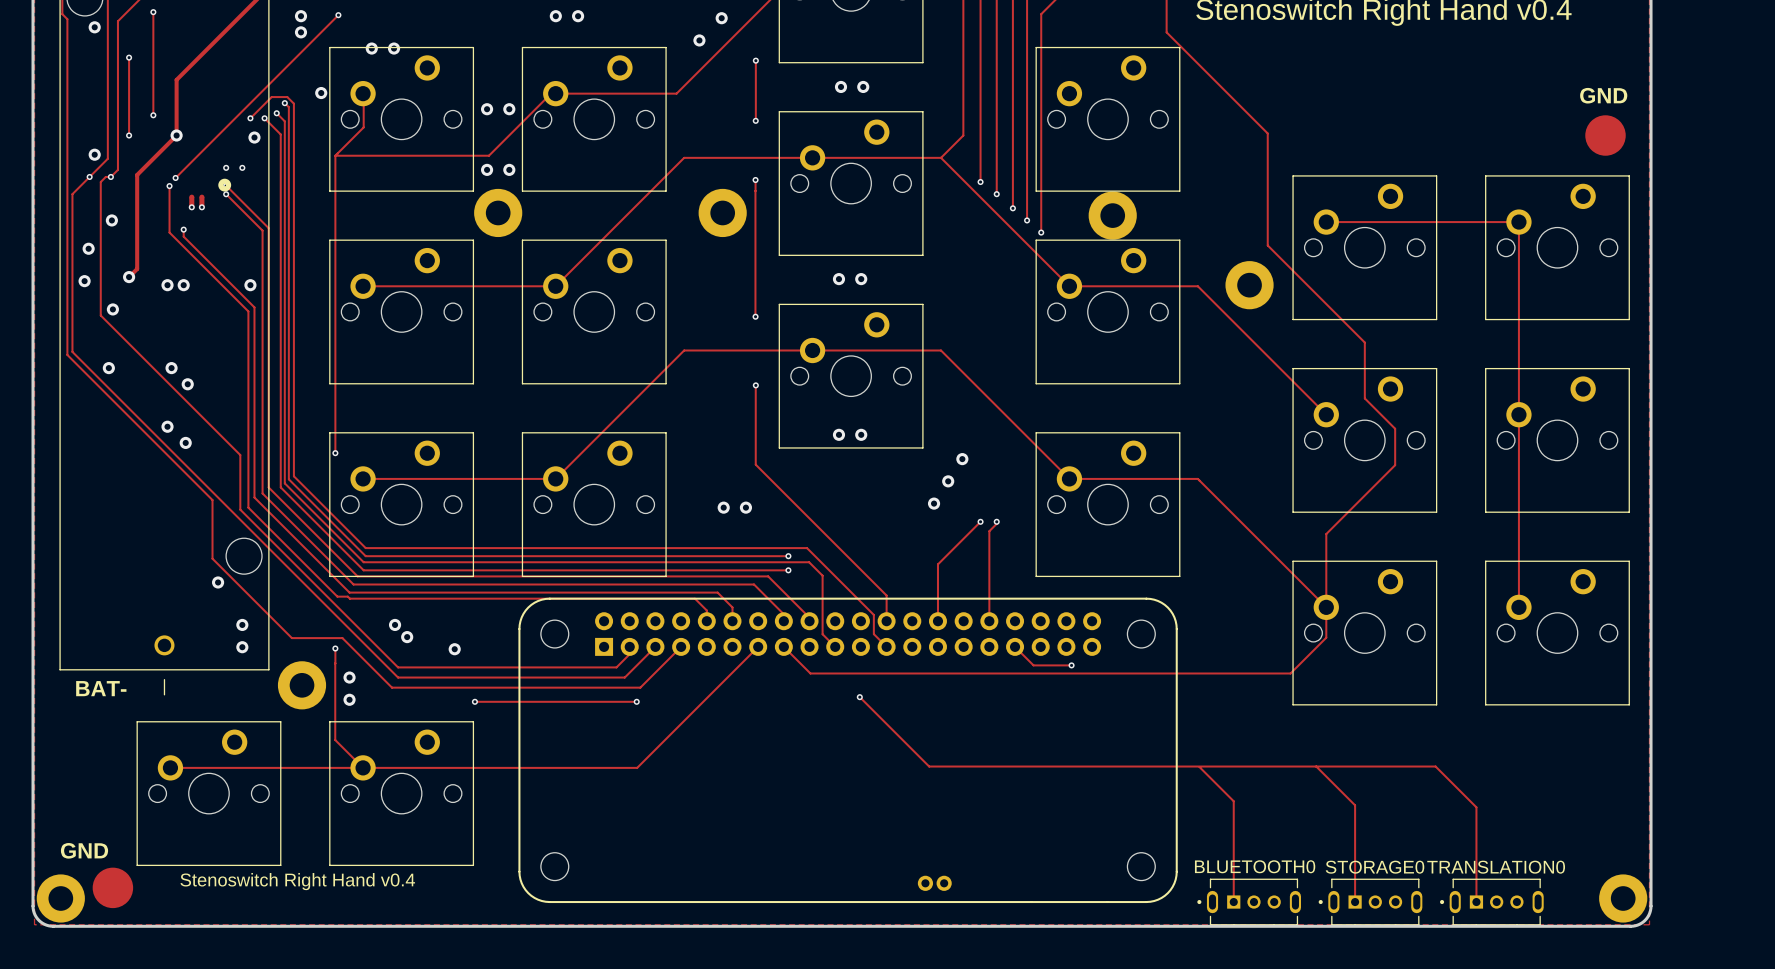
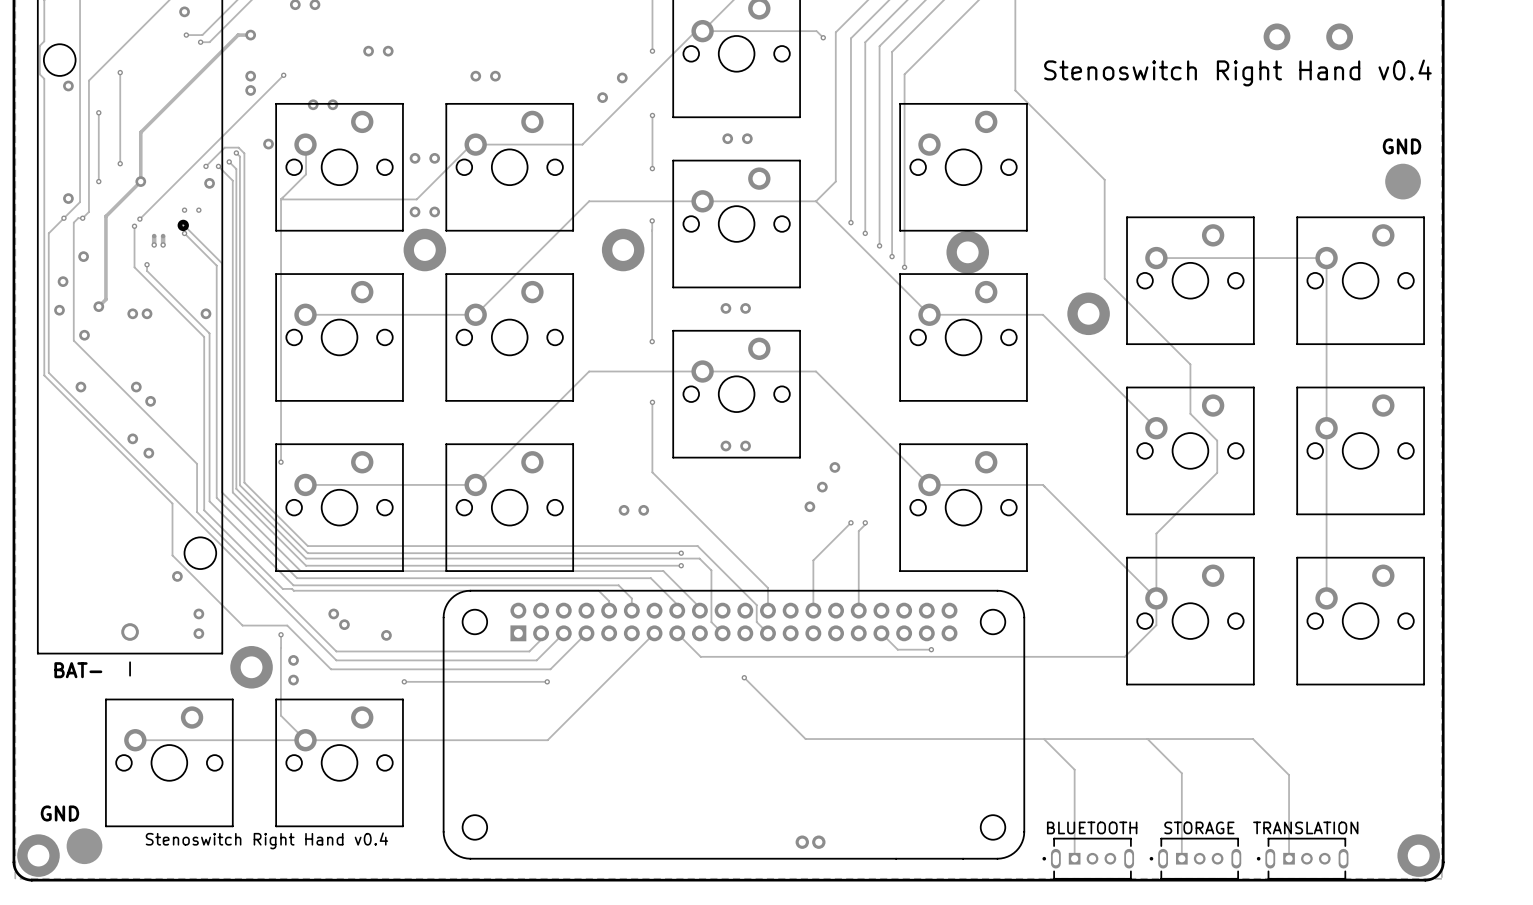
BLUETOOTH0 name: BLUETOOTH0 (1255, 866) -> none
text: none -> BLUETOOTH (1092, 827)
text: none -> STORAGE (1199, 827)
STORAGE0 name: STORAGE0 (1375, 867) -> none
text: none -> TRANSLATION (1305, 827)
TRANSLATION0 name: TRANSLATION0 (1496, 867) -> none

